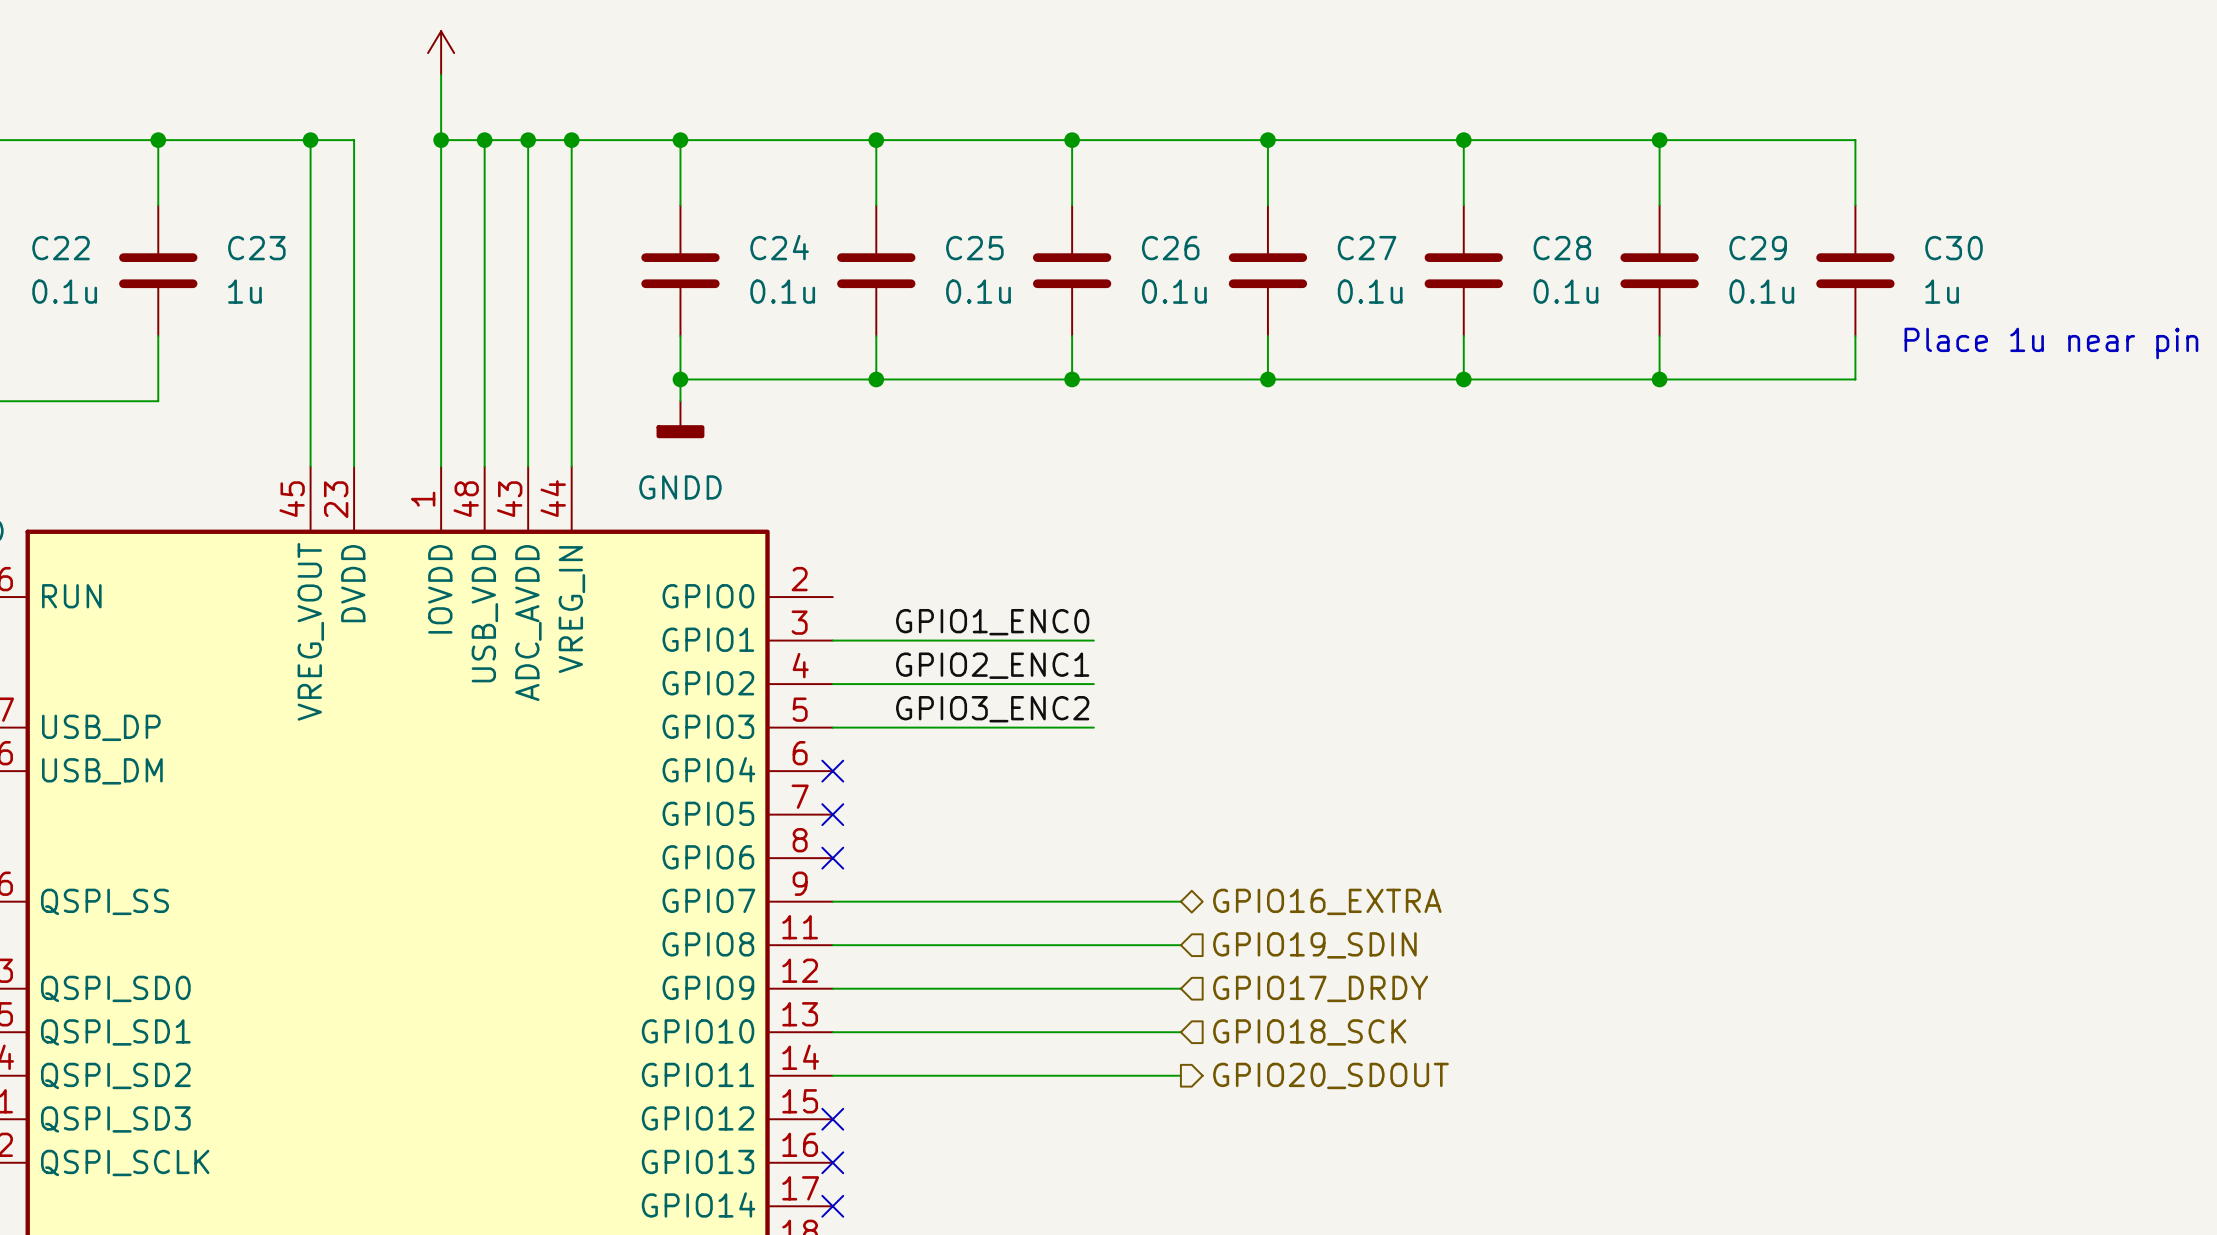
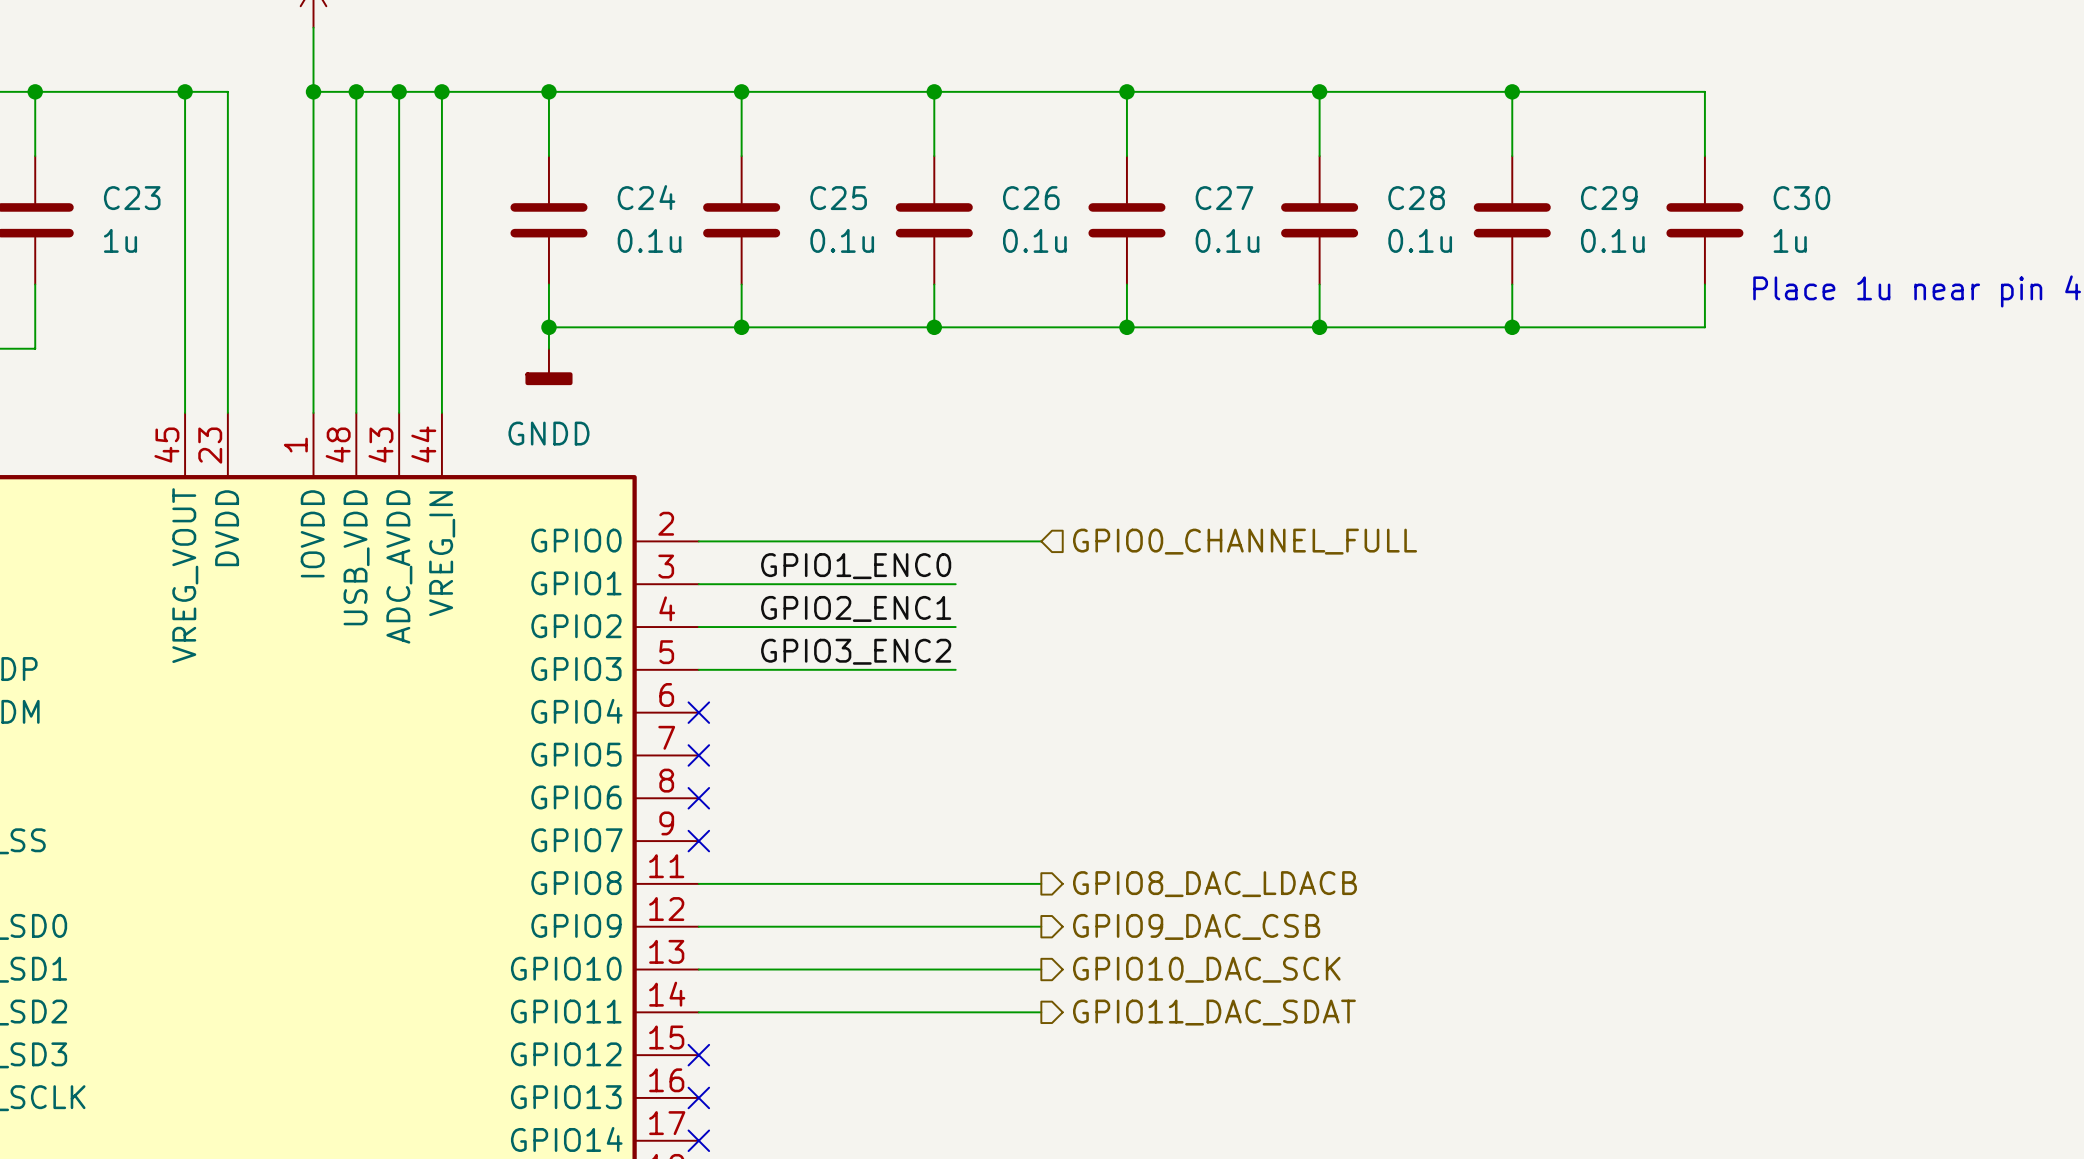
hierarchical label: none -> GPIO0_CHANNEL_FULL (1245, 541)
wire: (832, 901) (1180, 901) -> (698, 541) (1041, 541)
no-connect mark: none -> (698, 841)
hierarchical label: GPIO16_EXTRA (1327, 901) -> none
hierarchical label shape: input (1314, 945) -> output (1214, 884)
hierarchical label: GPIO19_SDIN (1314, 945) -> GPIO8_DAC_LDACB (1214, 884)
hierarchical label shape: input (1320, 988) -> output (1196, 926)
hierarchical label: GPIO17_DRDY (1320, 988) -> GPIO9_DAC_CSB (1196, 926)
hierarchical label shape: input (1309, 1032) -> output (1206, 969)
hierarchical label: GPIO18_SCK (1309, 1032) -> GPIO10_DAC_SCK (1206, 969)
hierarchical label: GPIO20_SDOUT (1330, 1075) -> GPIO11_DAC_SDAT (1214, 1012)

